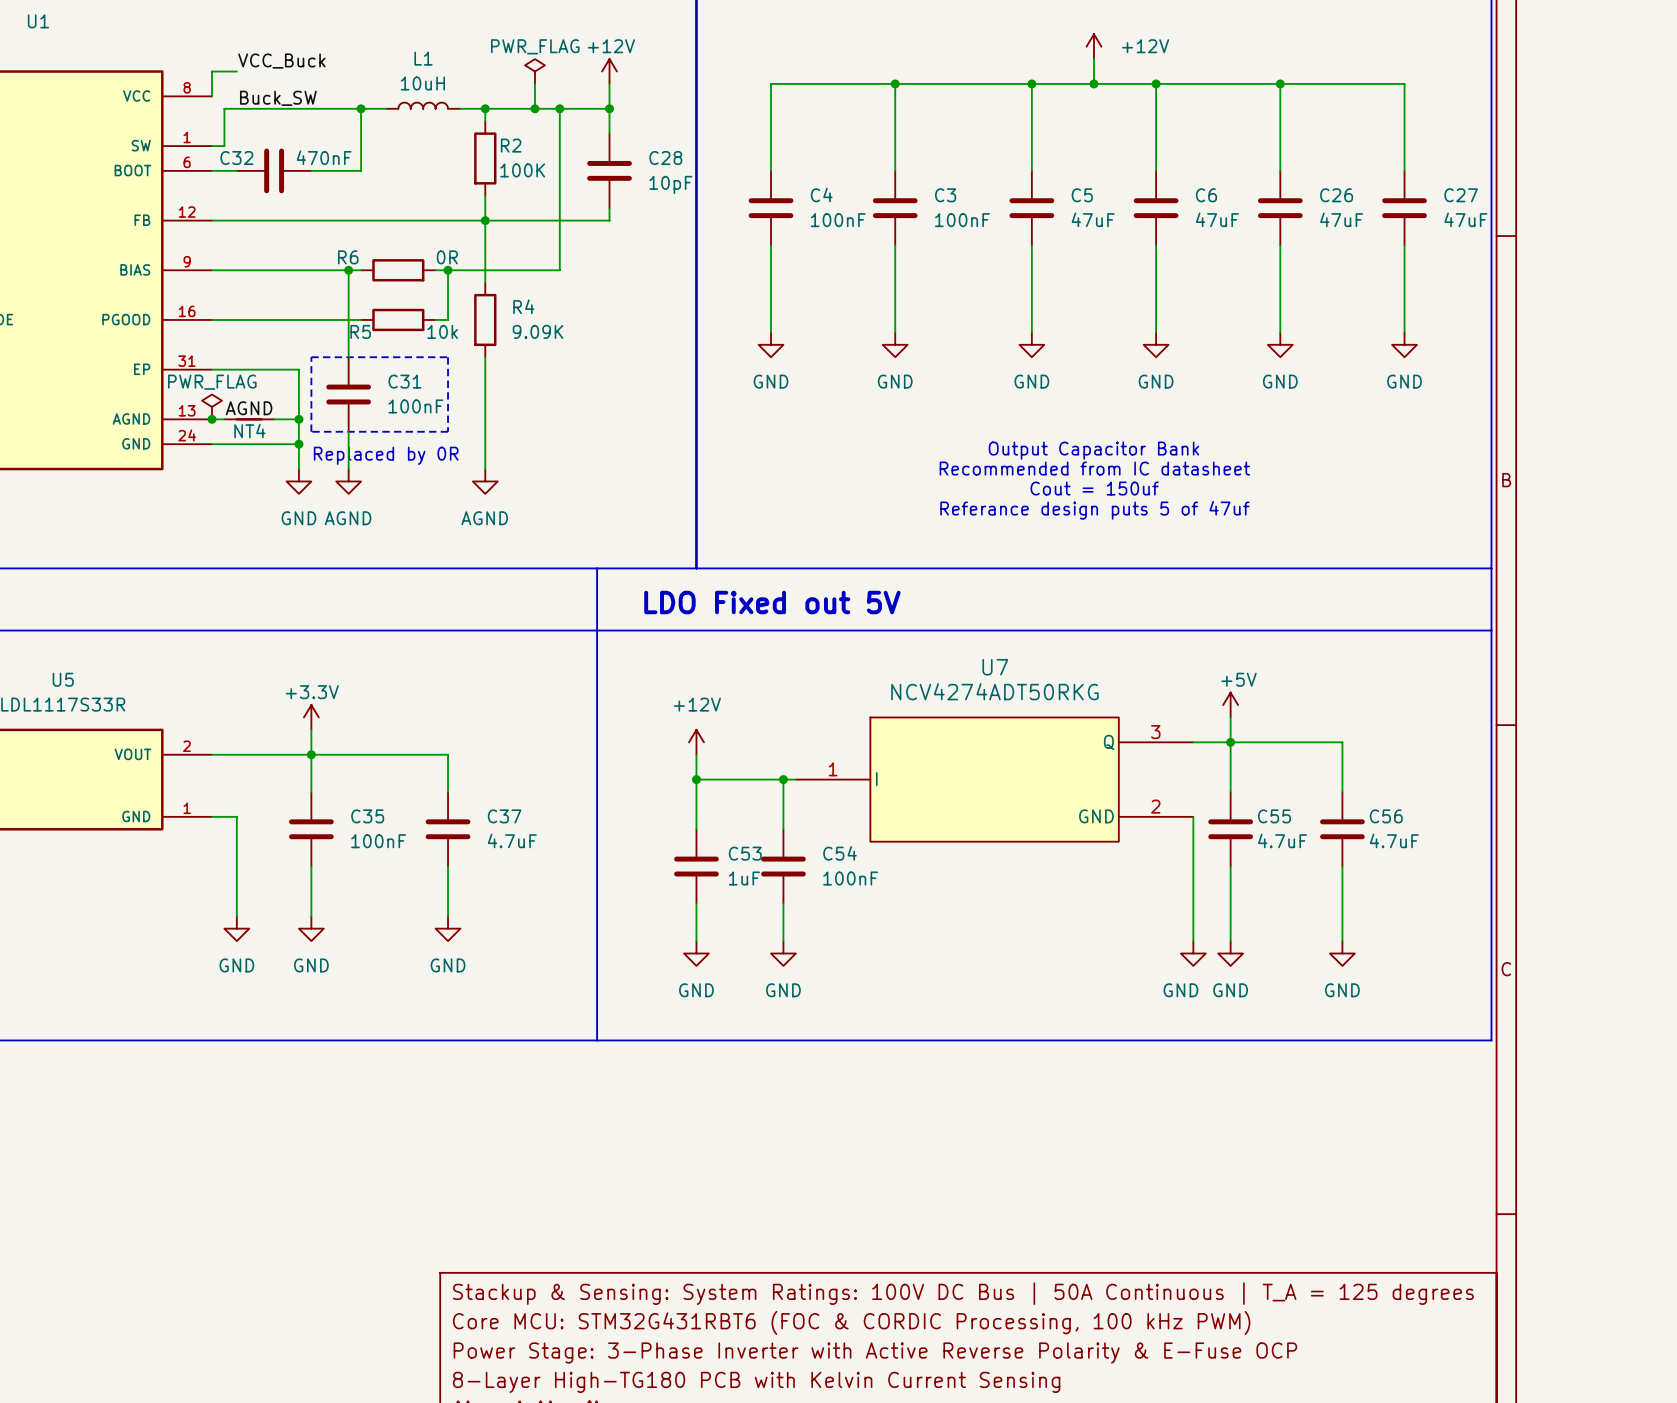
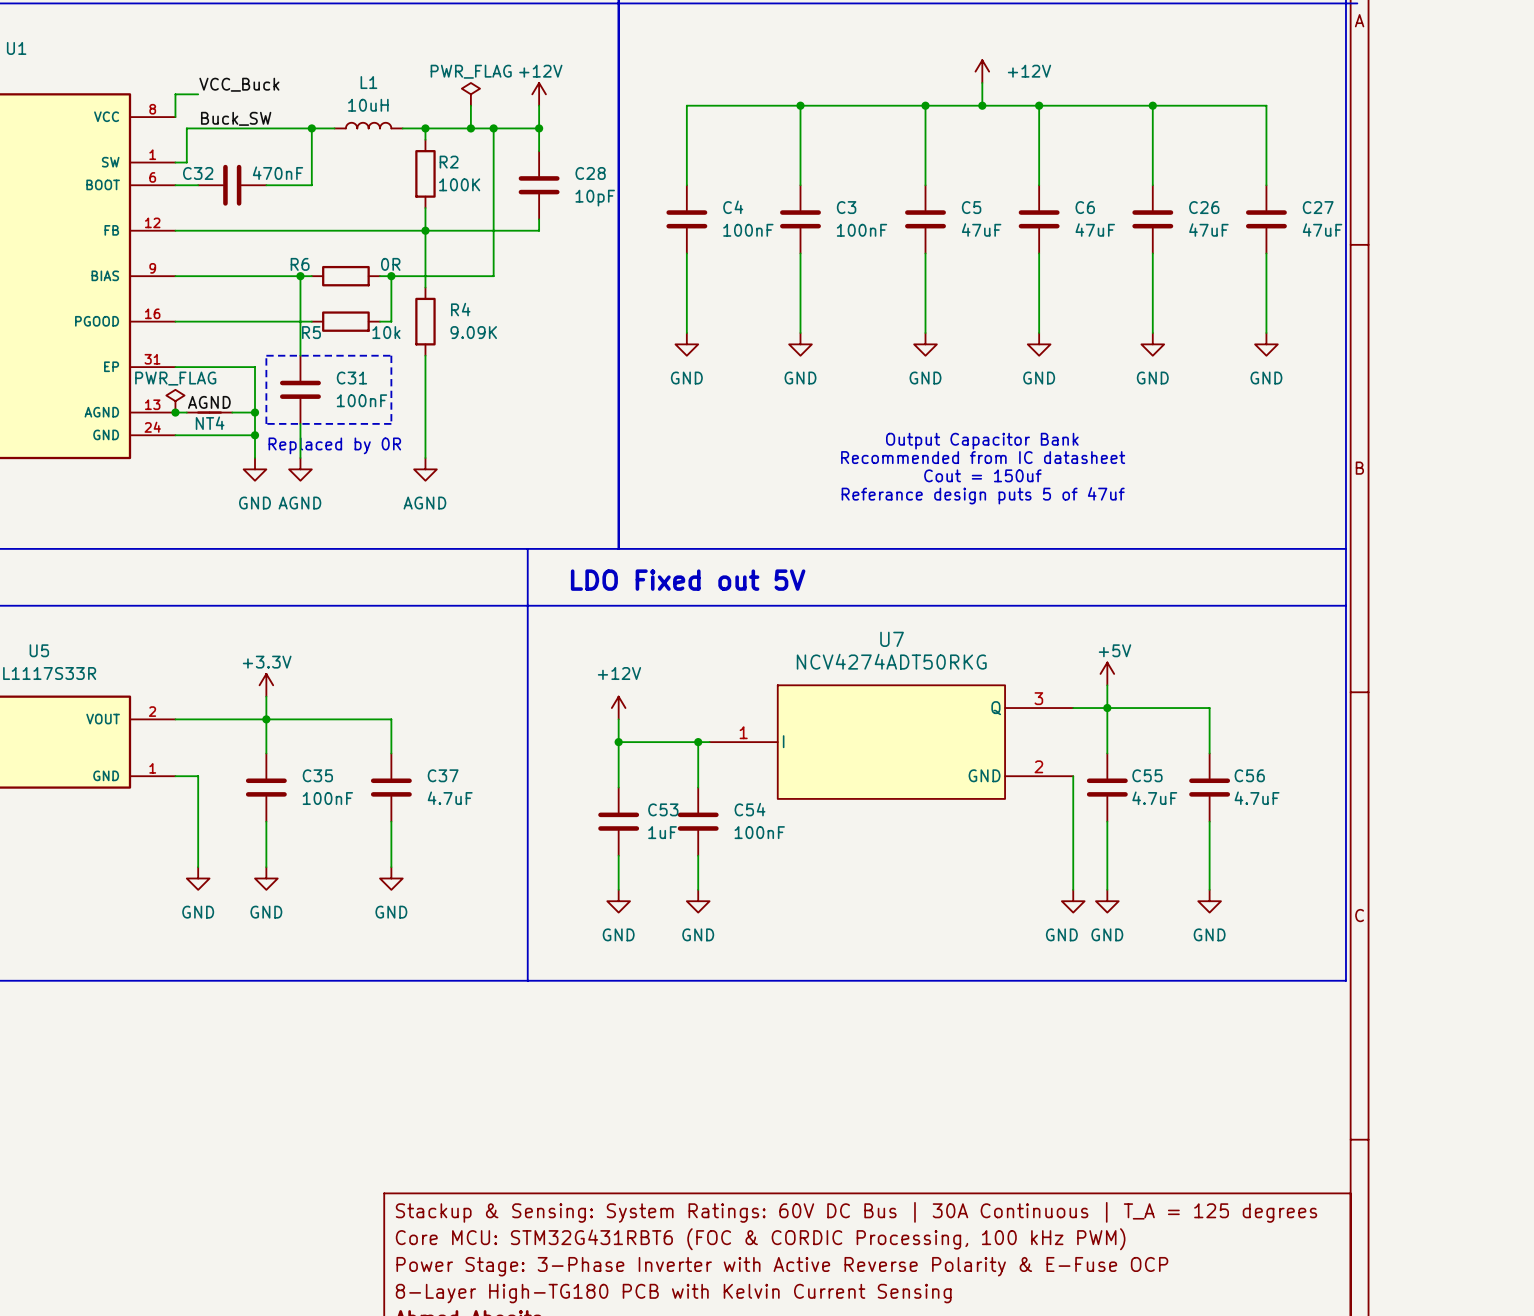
title block: Stackup & Sensing: System Ratings: 100V DC Bus | 50A Continuous | T_A = 125 degrees (963, 1293) -> Stackup & Sensing: System Ratings: 60V DC Bus | 30A Continuous | T_A = 125 degrees (856, 1212)

